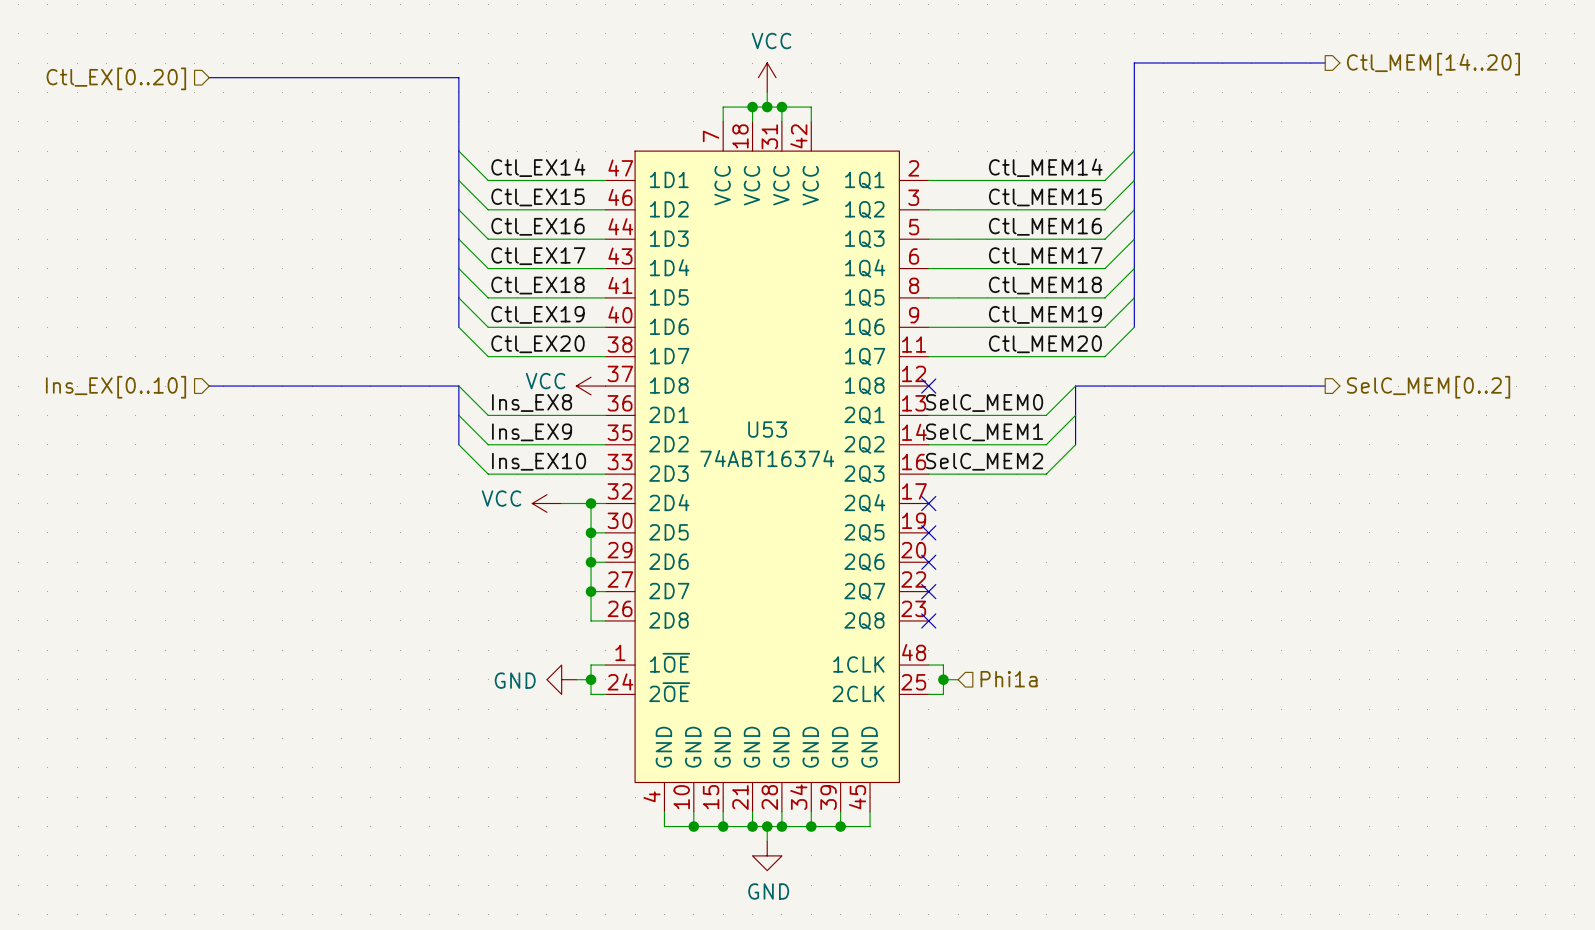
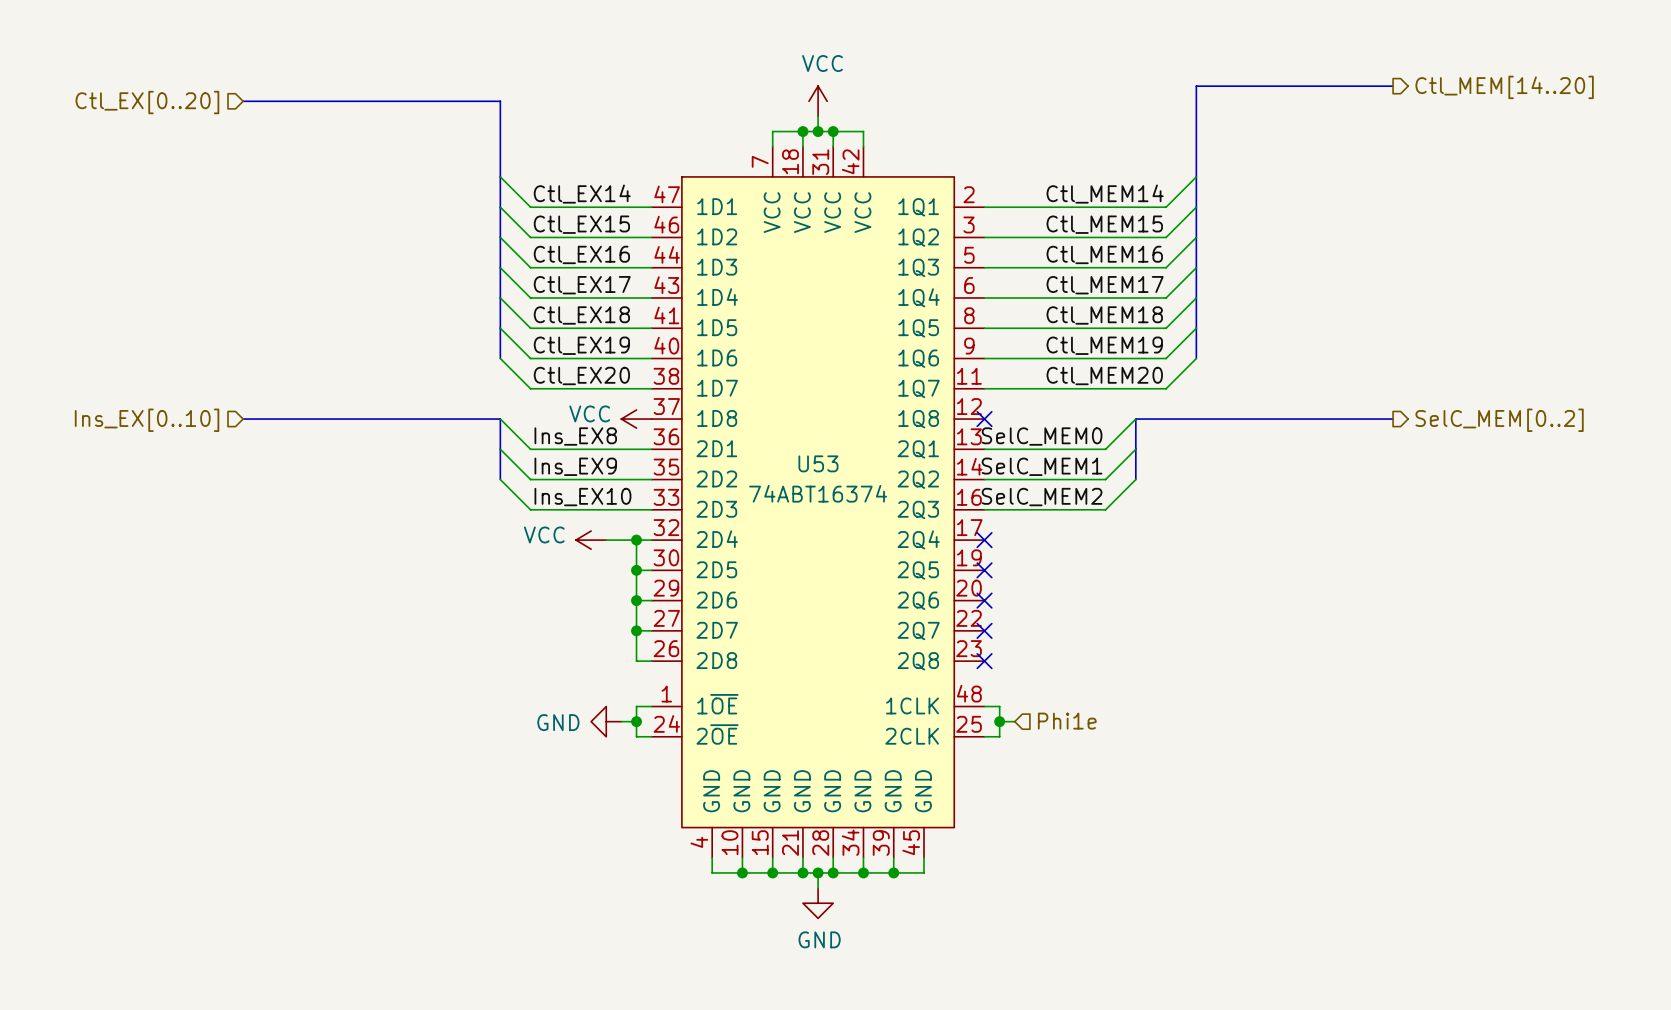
hierarchical label: Phi1a (1009, 679) -> Phi1e (1067, 721)

